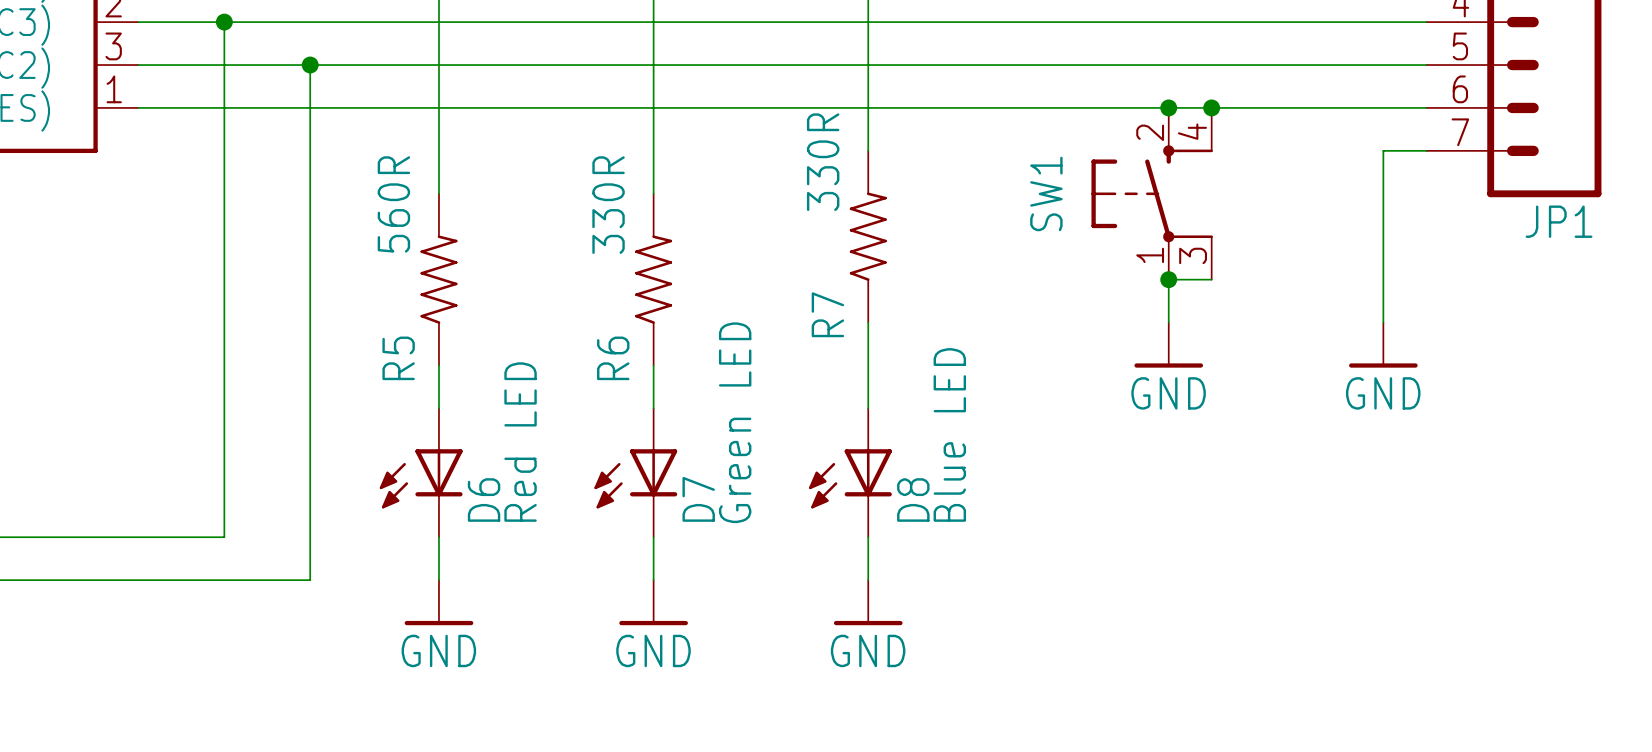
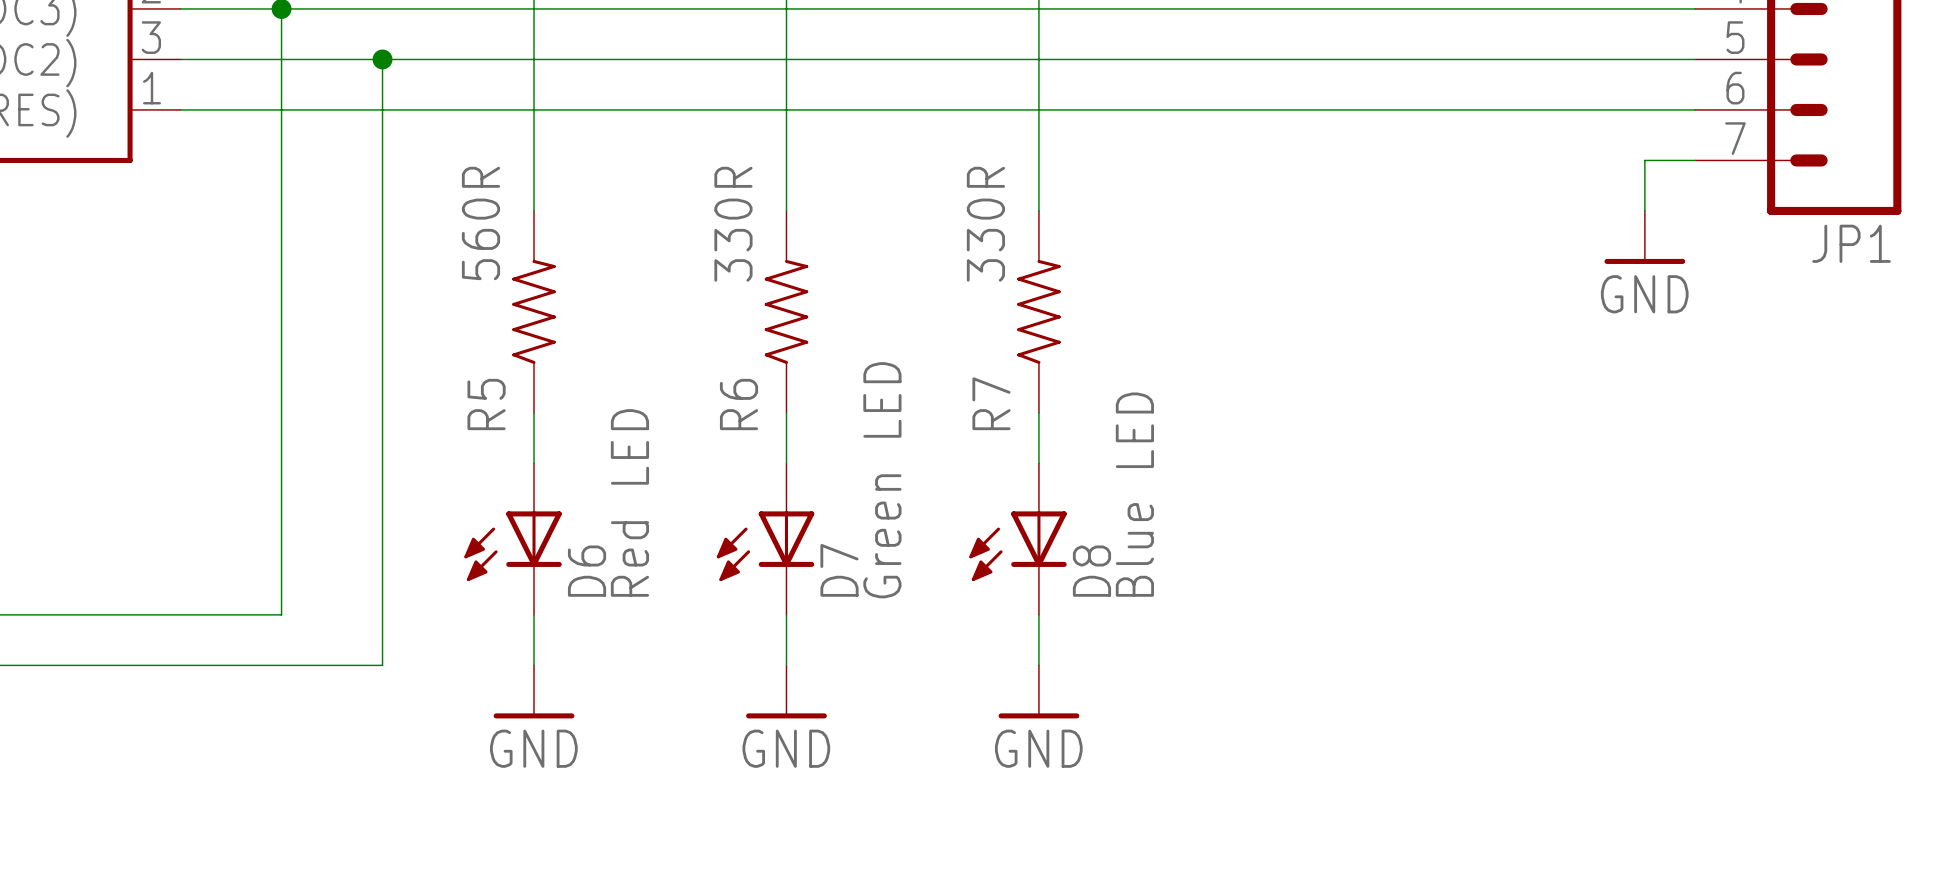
junction: (1168, 107) -> none
junction: (1211, 107) -> none
SW1: (1152, 193) -> none
wire: (1383, 193) (1383, 322) -> none
power symbol: none -> GND (1644, 237)
R7 position: (868, 236) -> (1038, 311)
junction: (1168, 279) -> none
wire: (1211, 279) (1168, 279) (1168, 322) -> none
power symbol: GND (1168, 345) -> none
power symbol: GND (1383, 345) -> none

